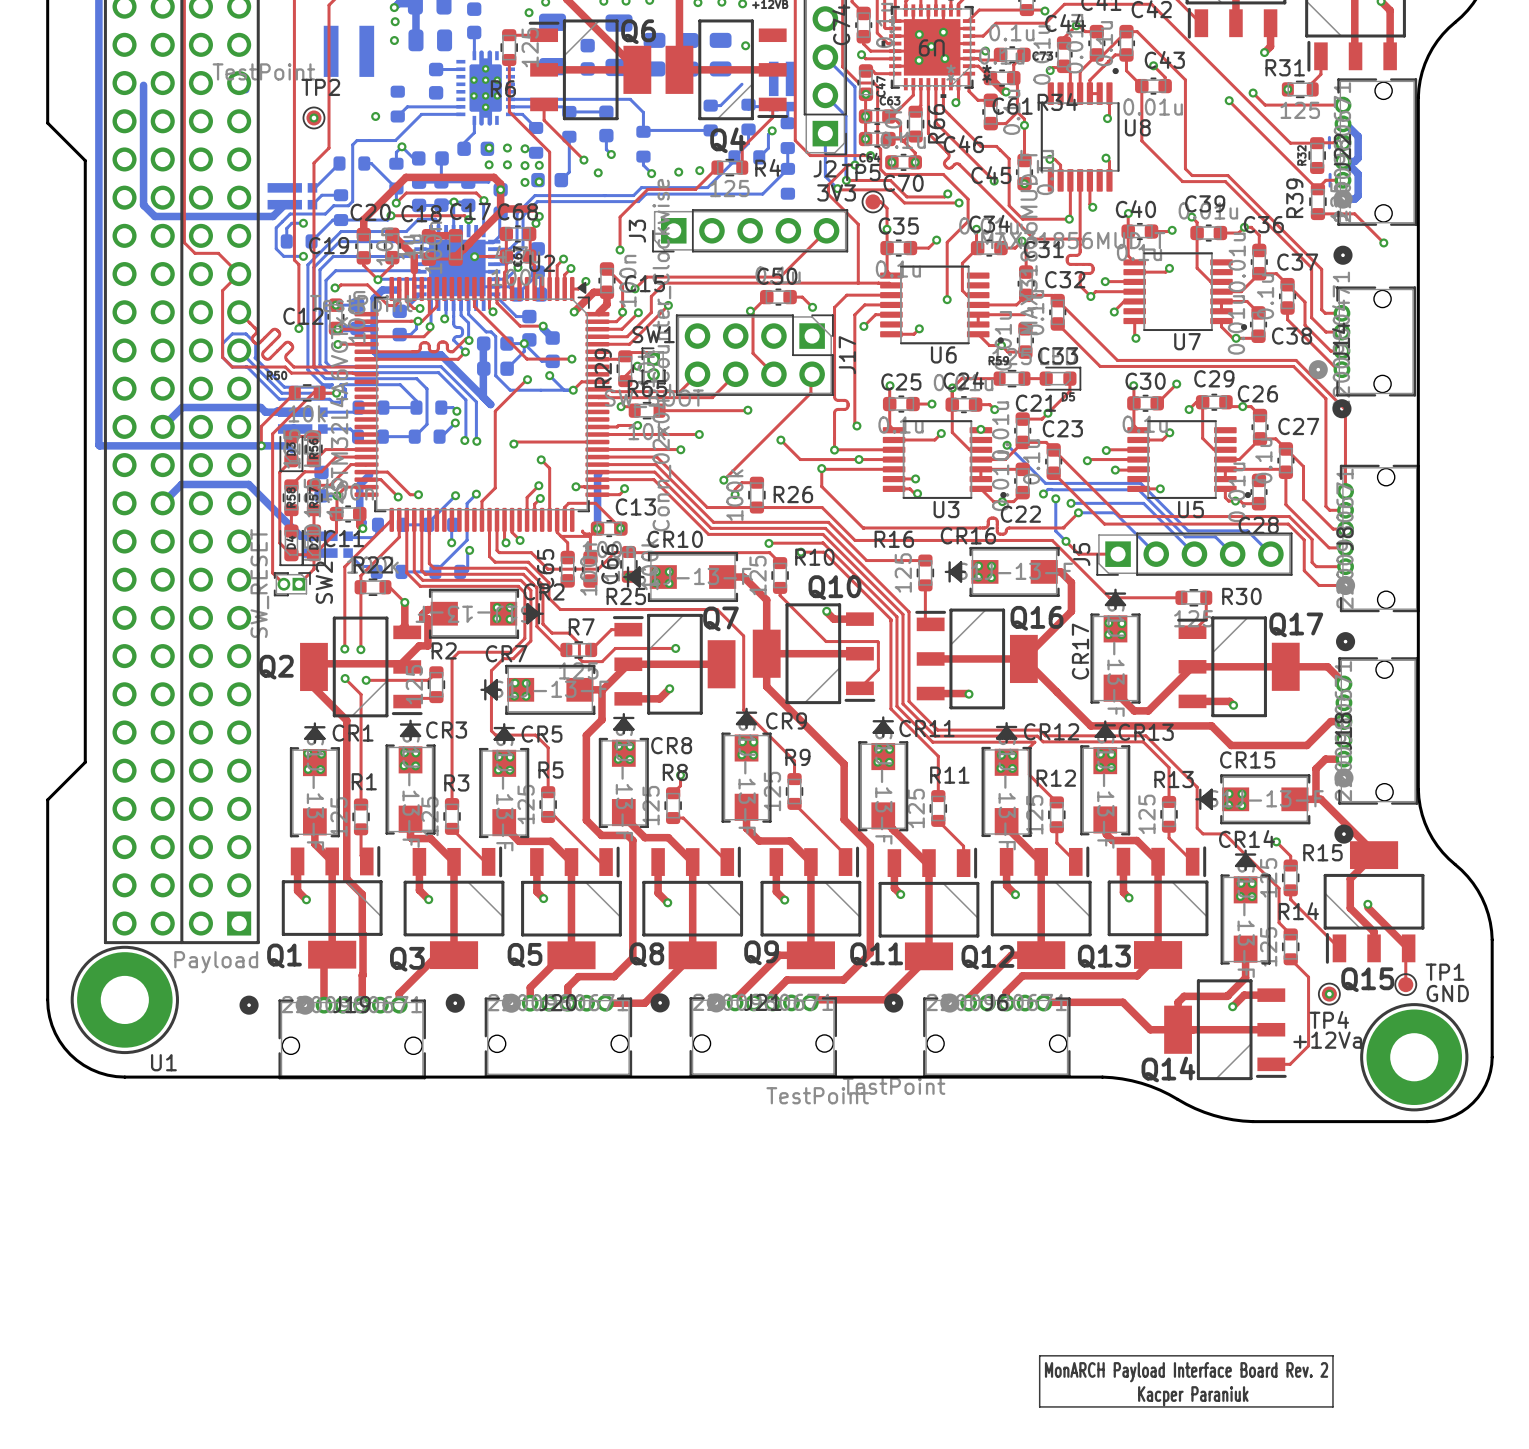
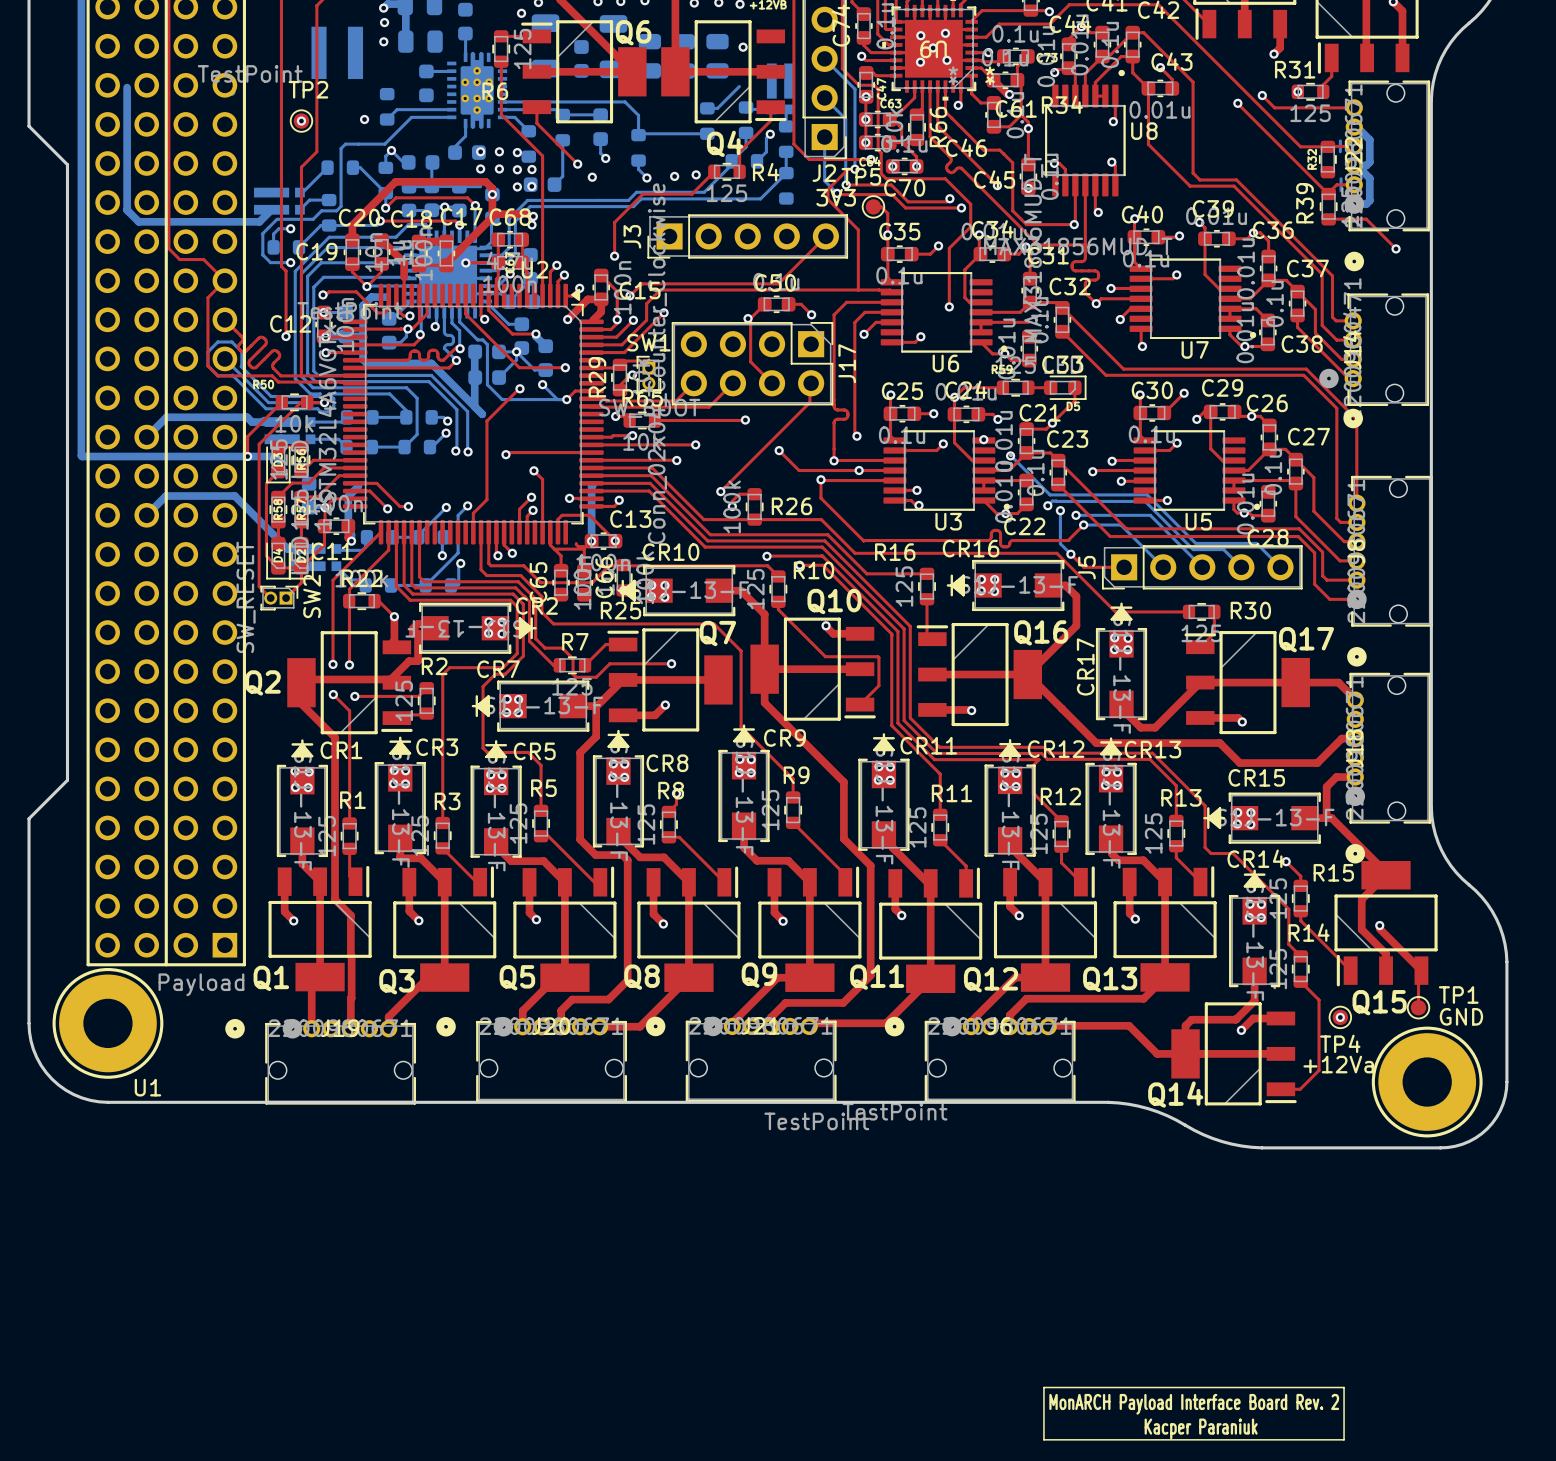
via: none -> (533, 216)
via: (539, 216) -> none
via: none -> (531, 224)
via: (535, 223) -> none

